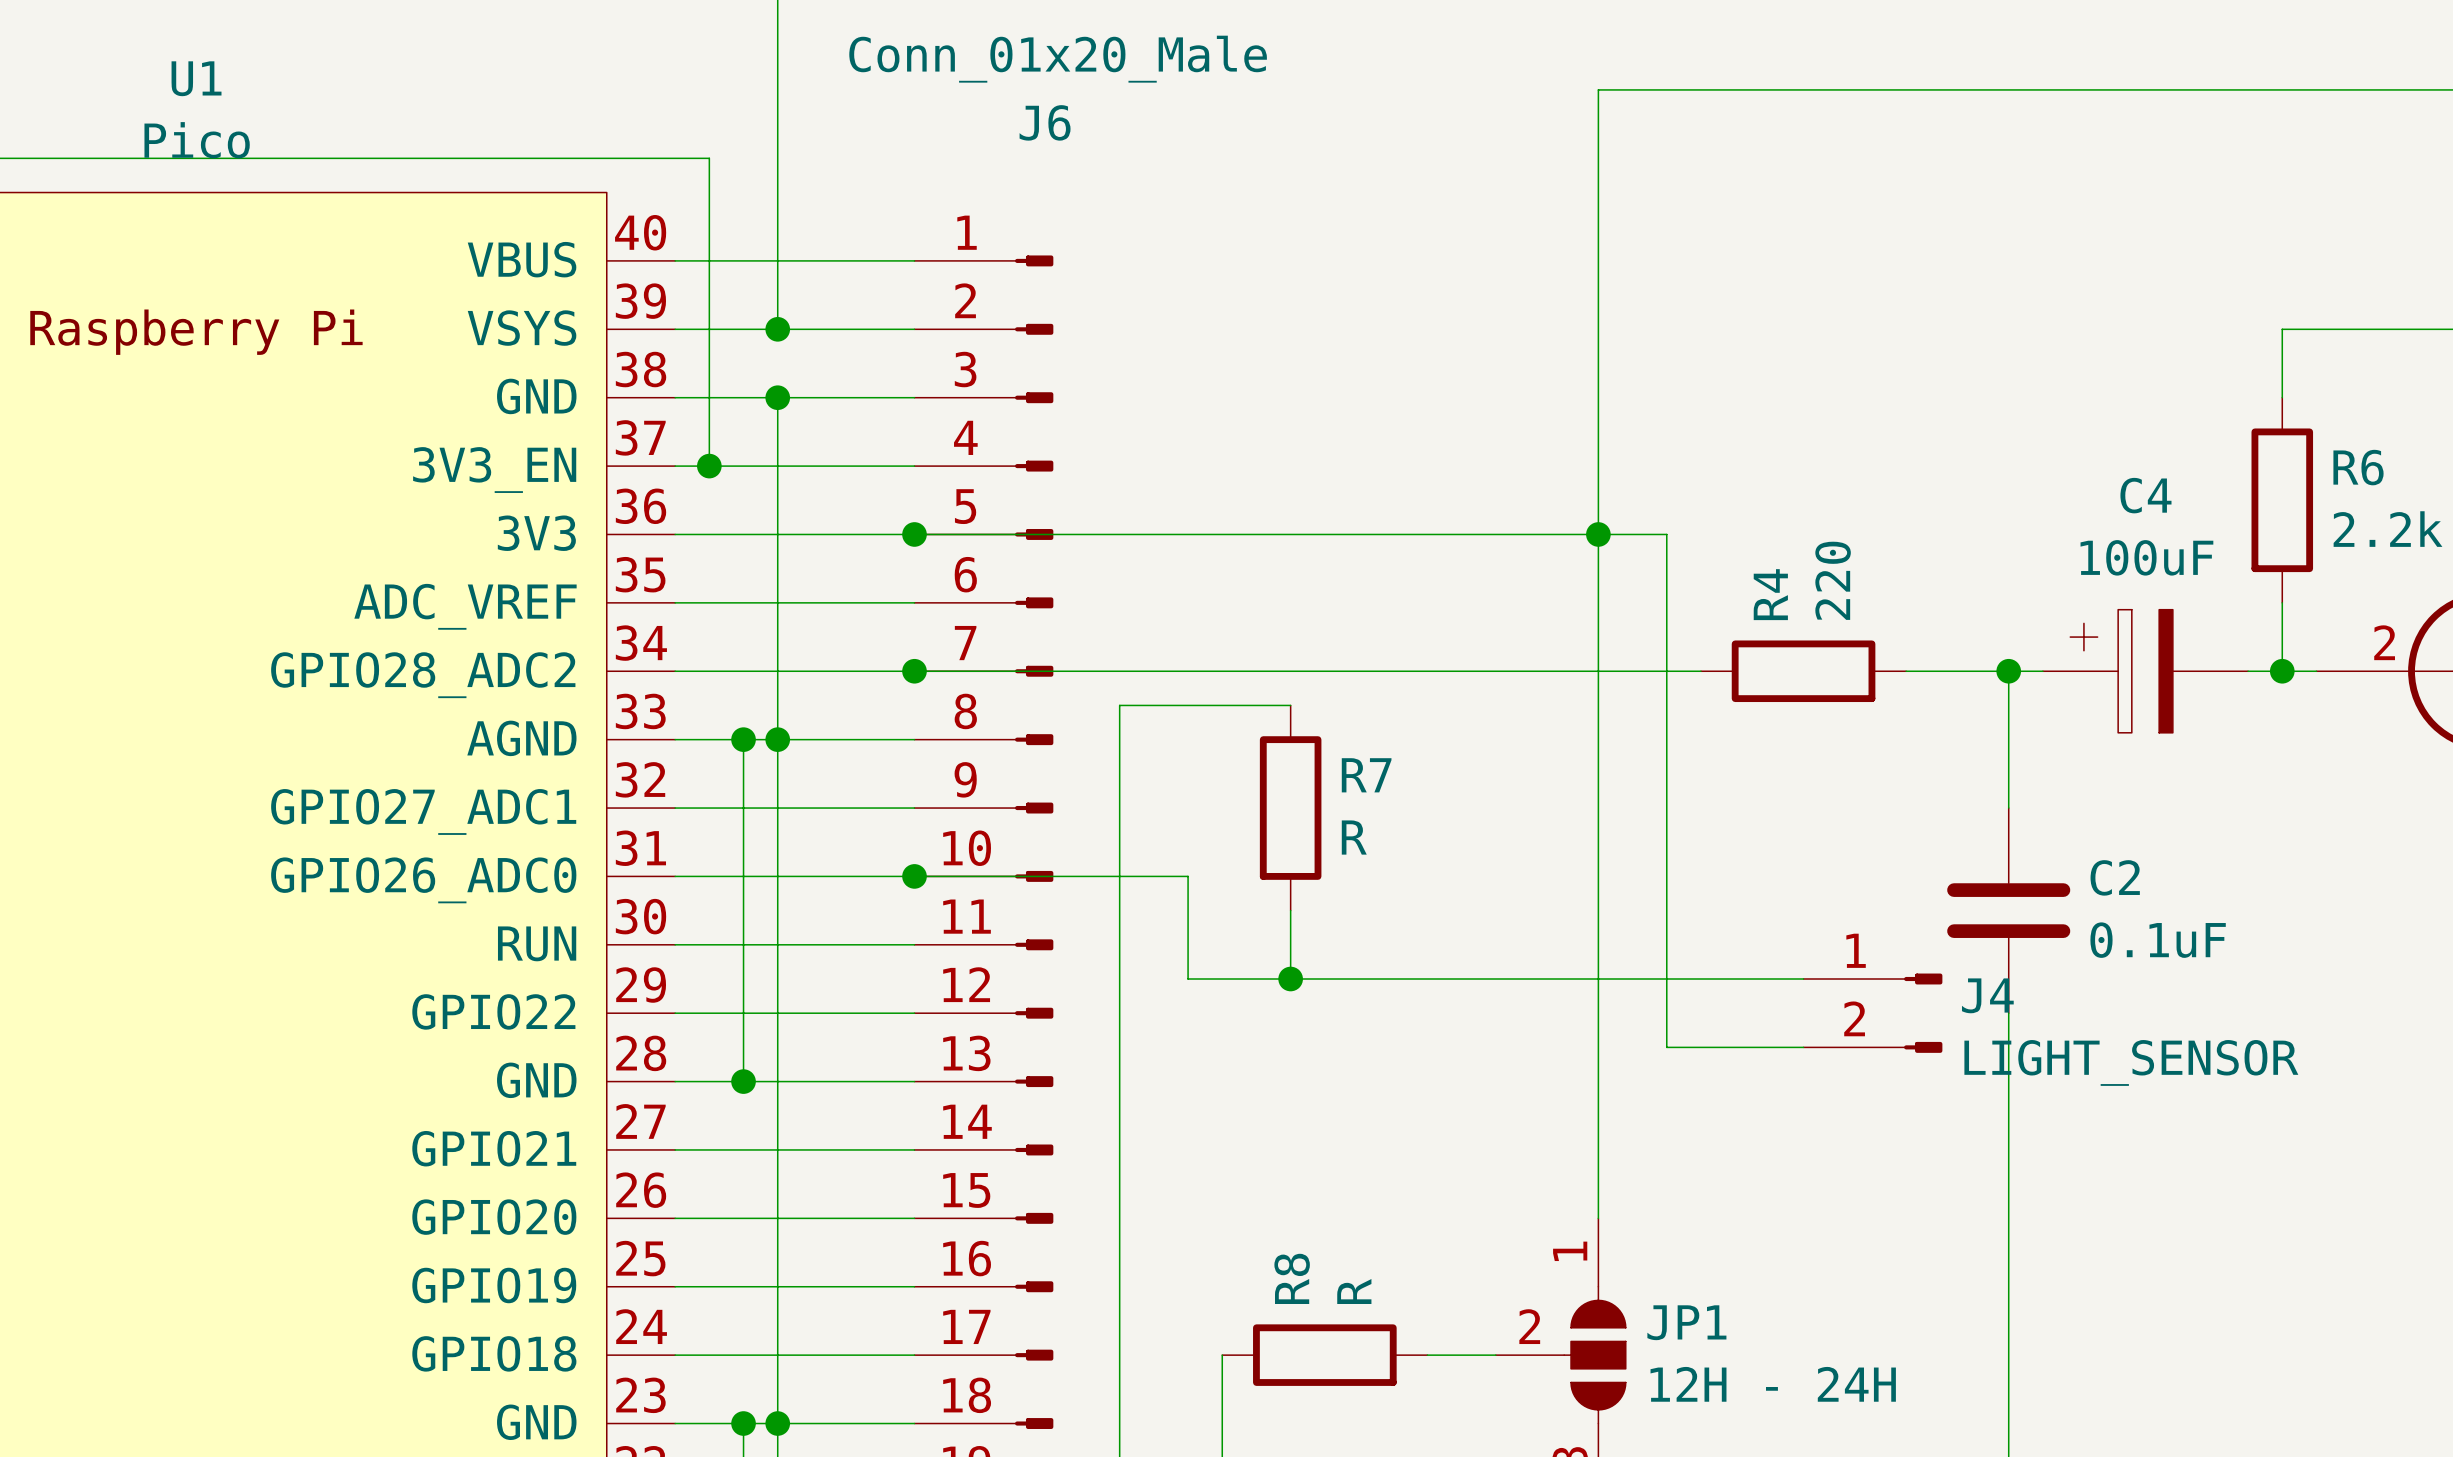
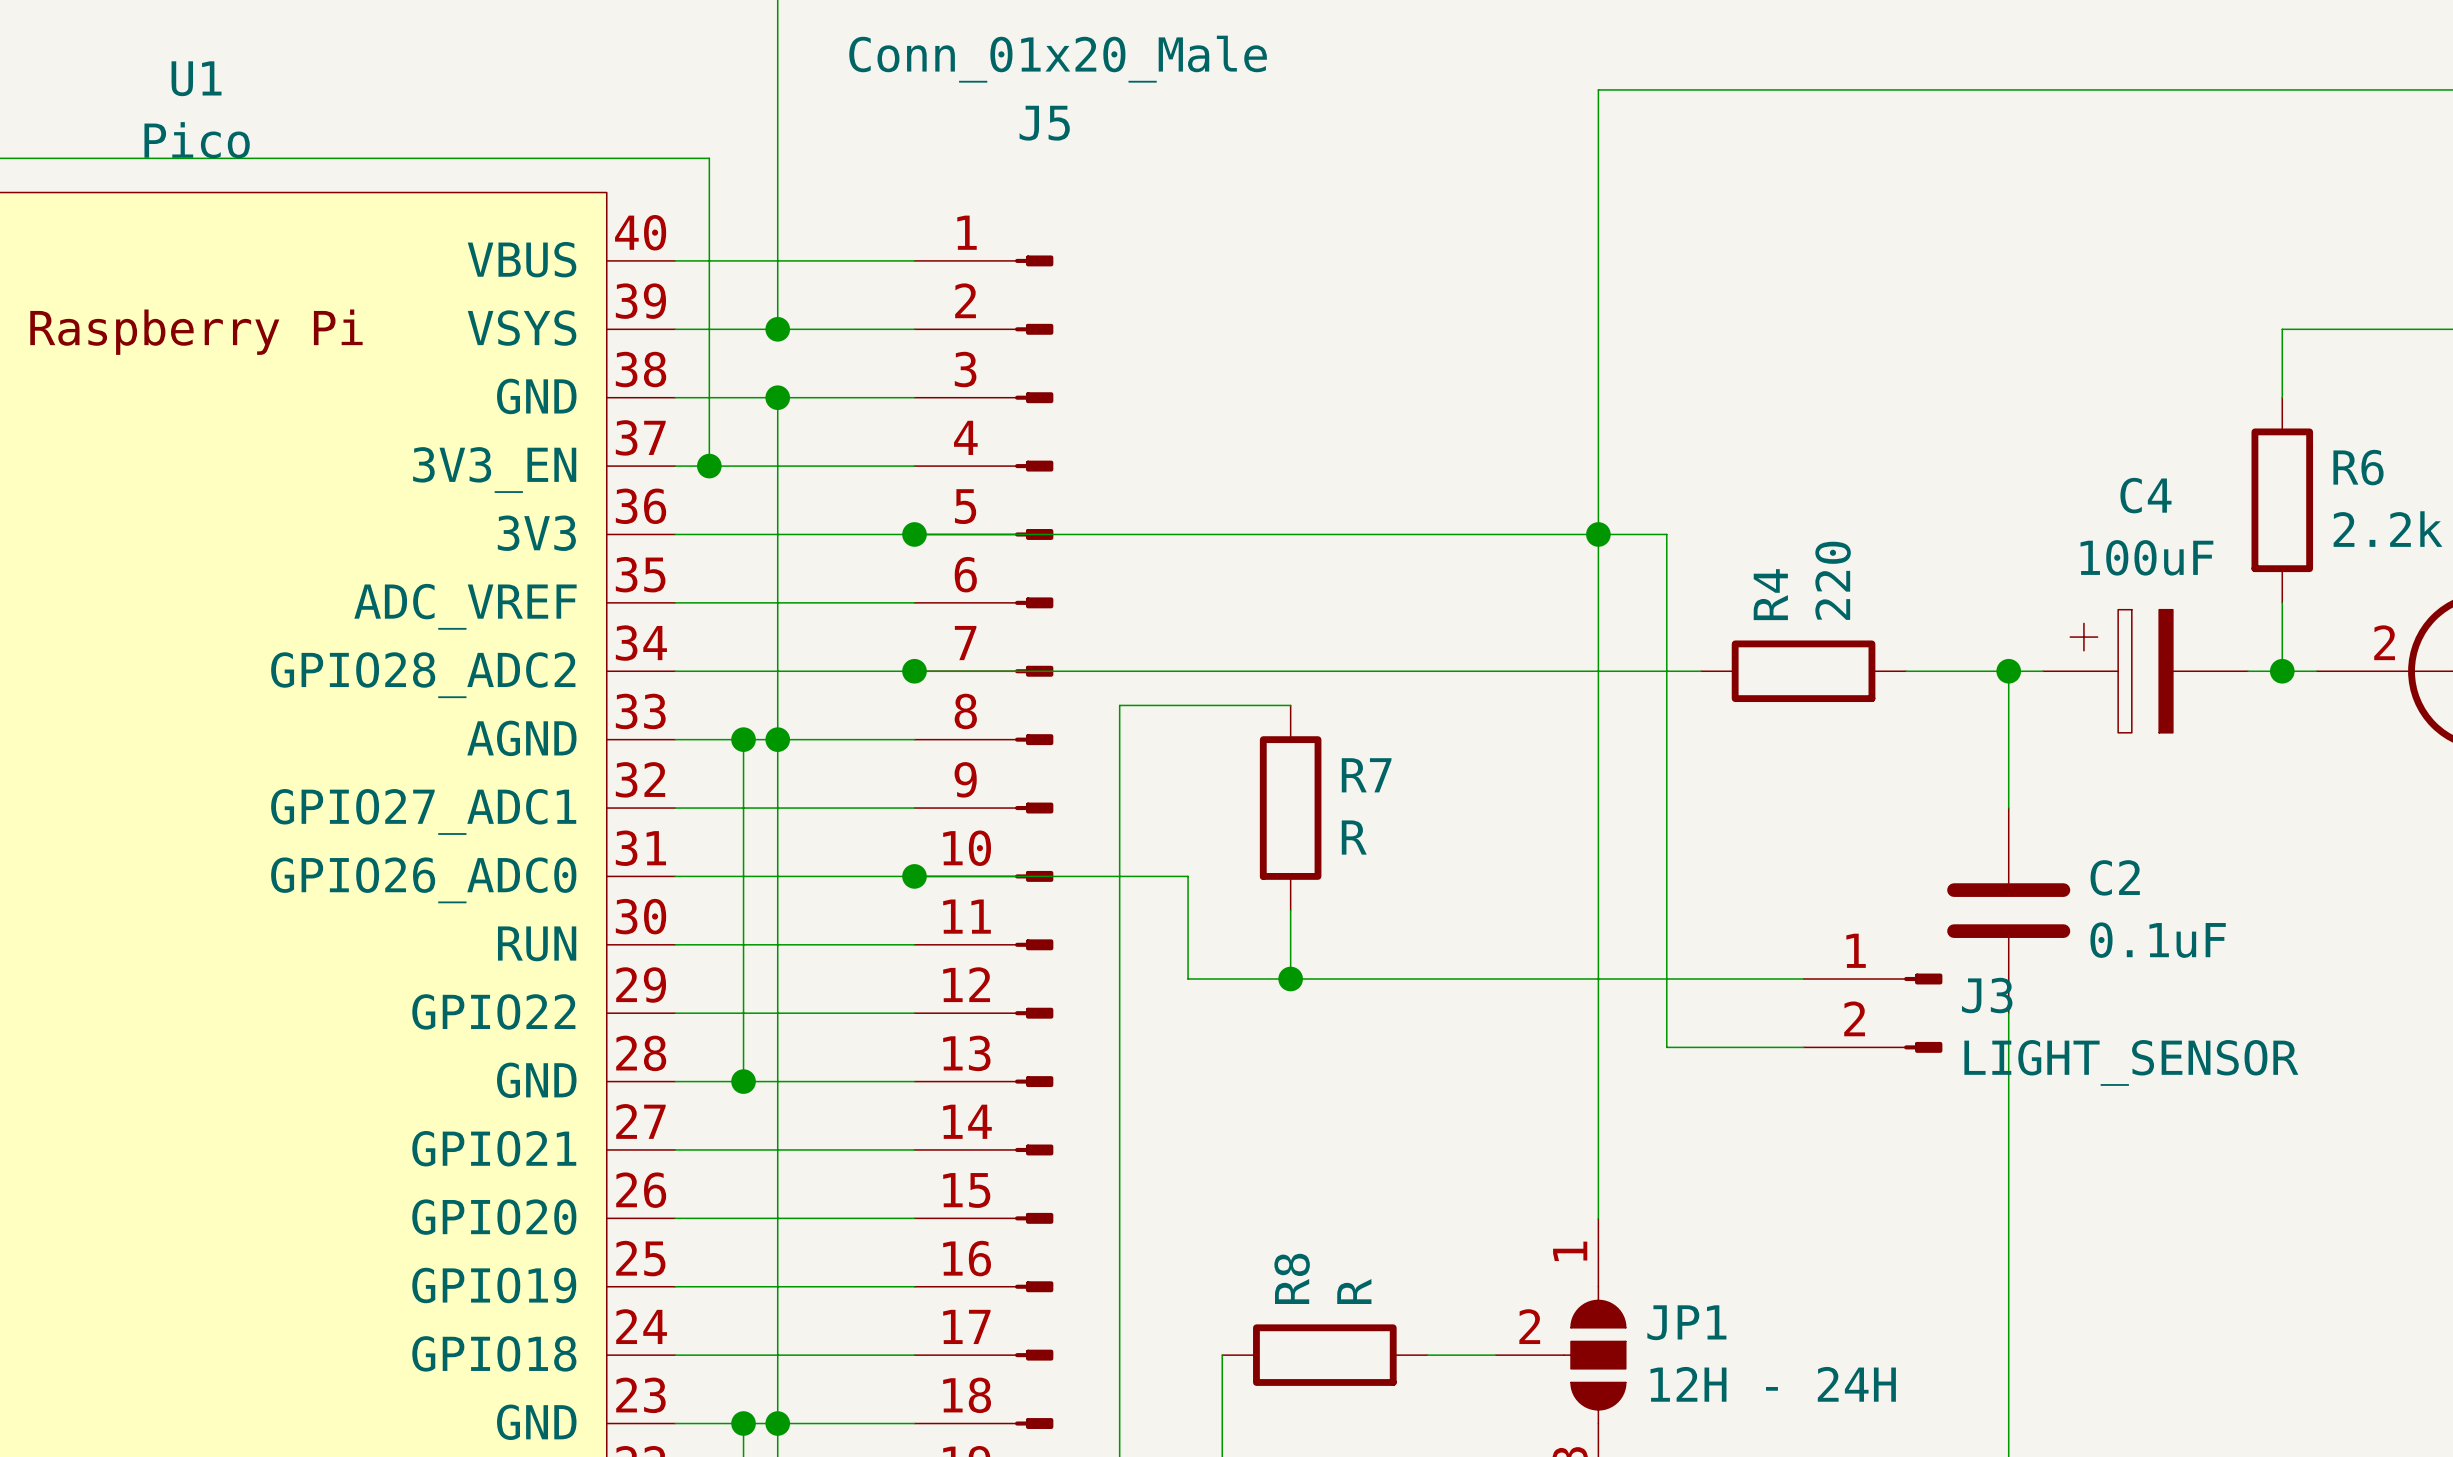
J6 name: J6 (1045, 122) -> J5 (1044, 123)
J4 name: J4 (1987, 995) -> J3 (1987, 995)

